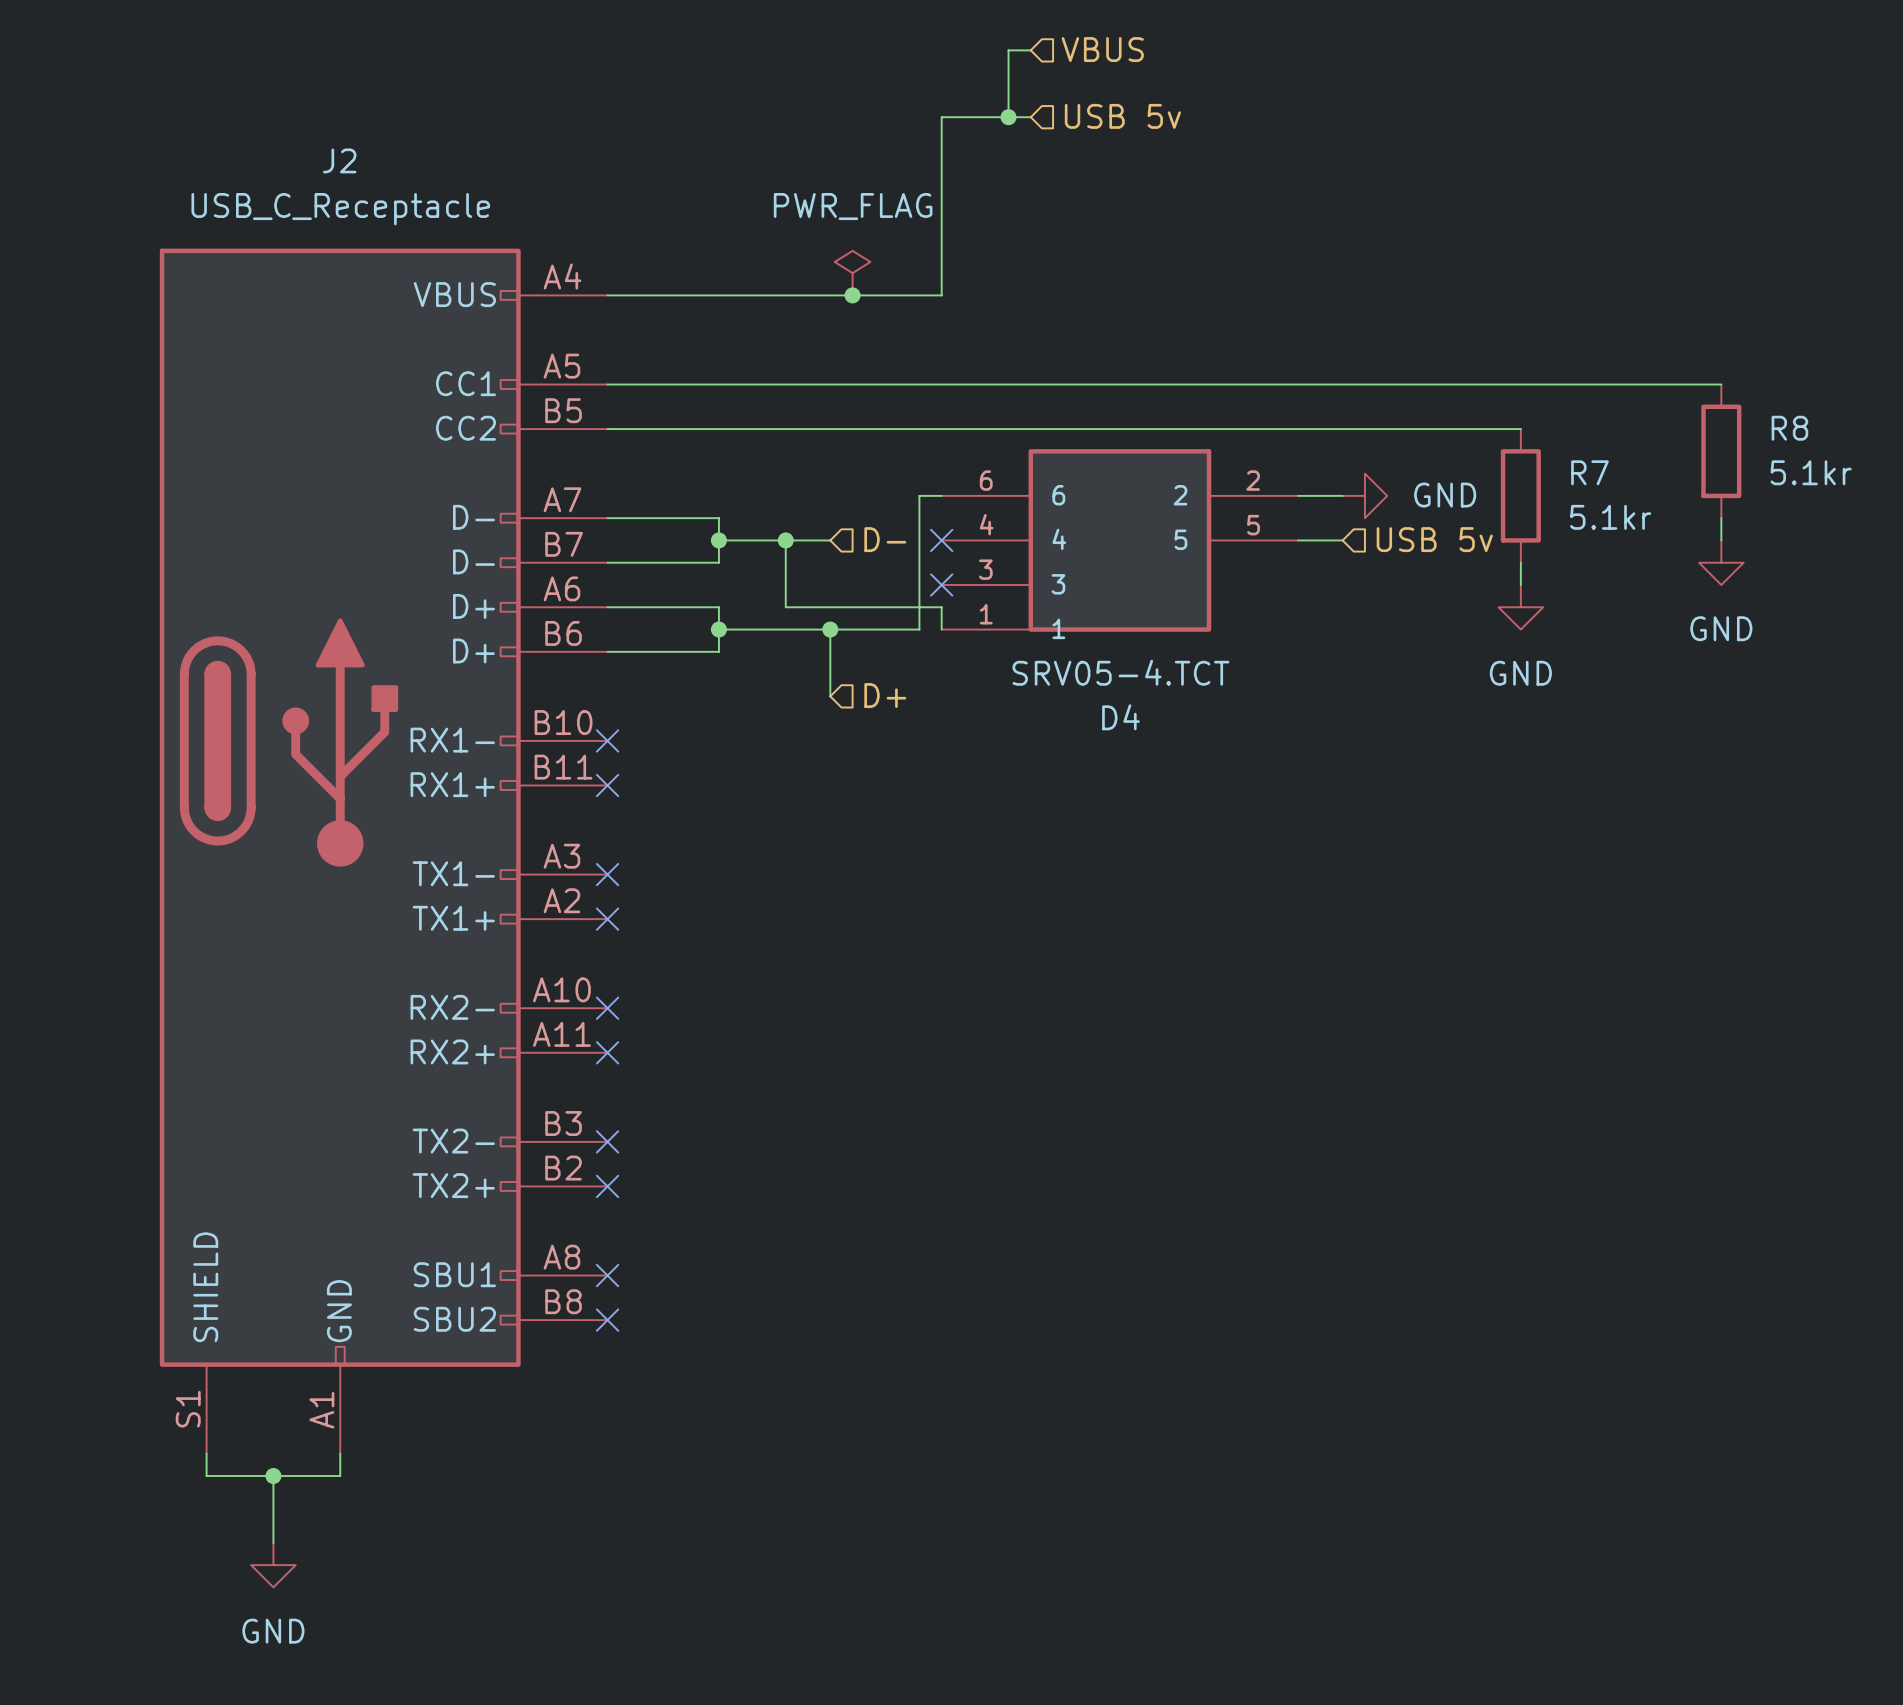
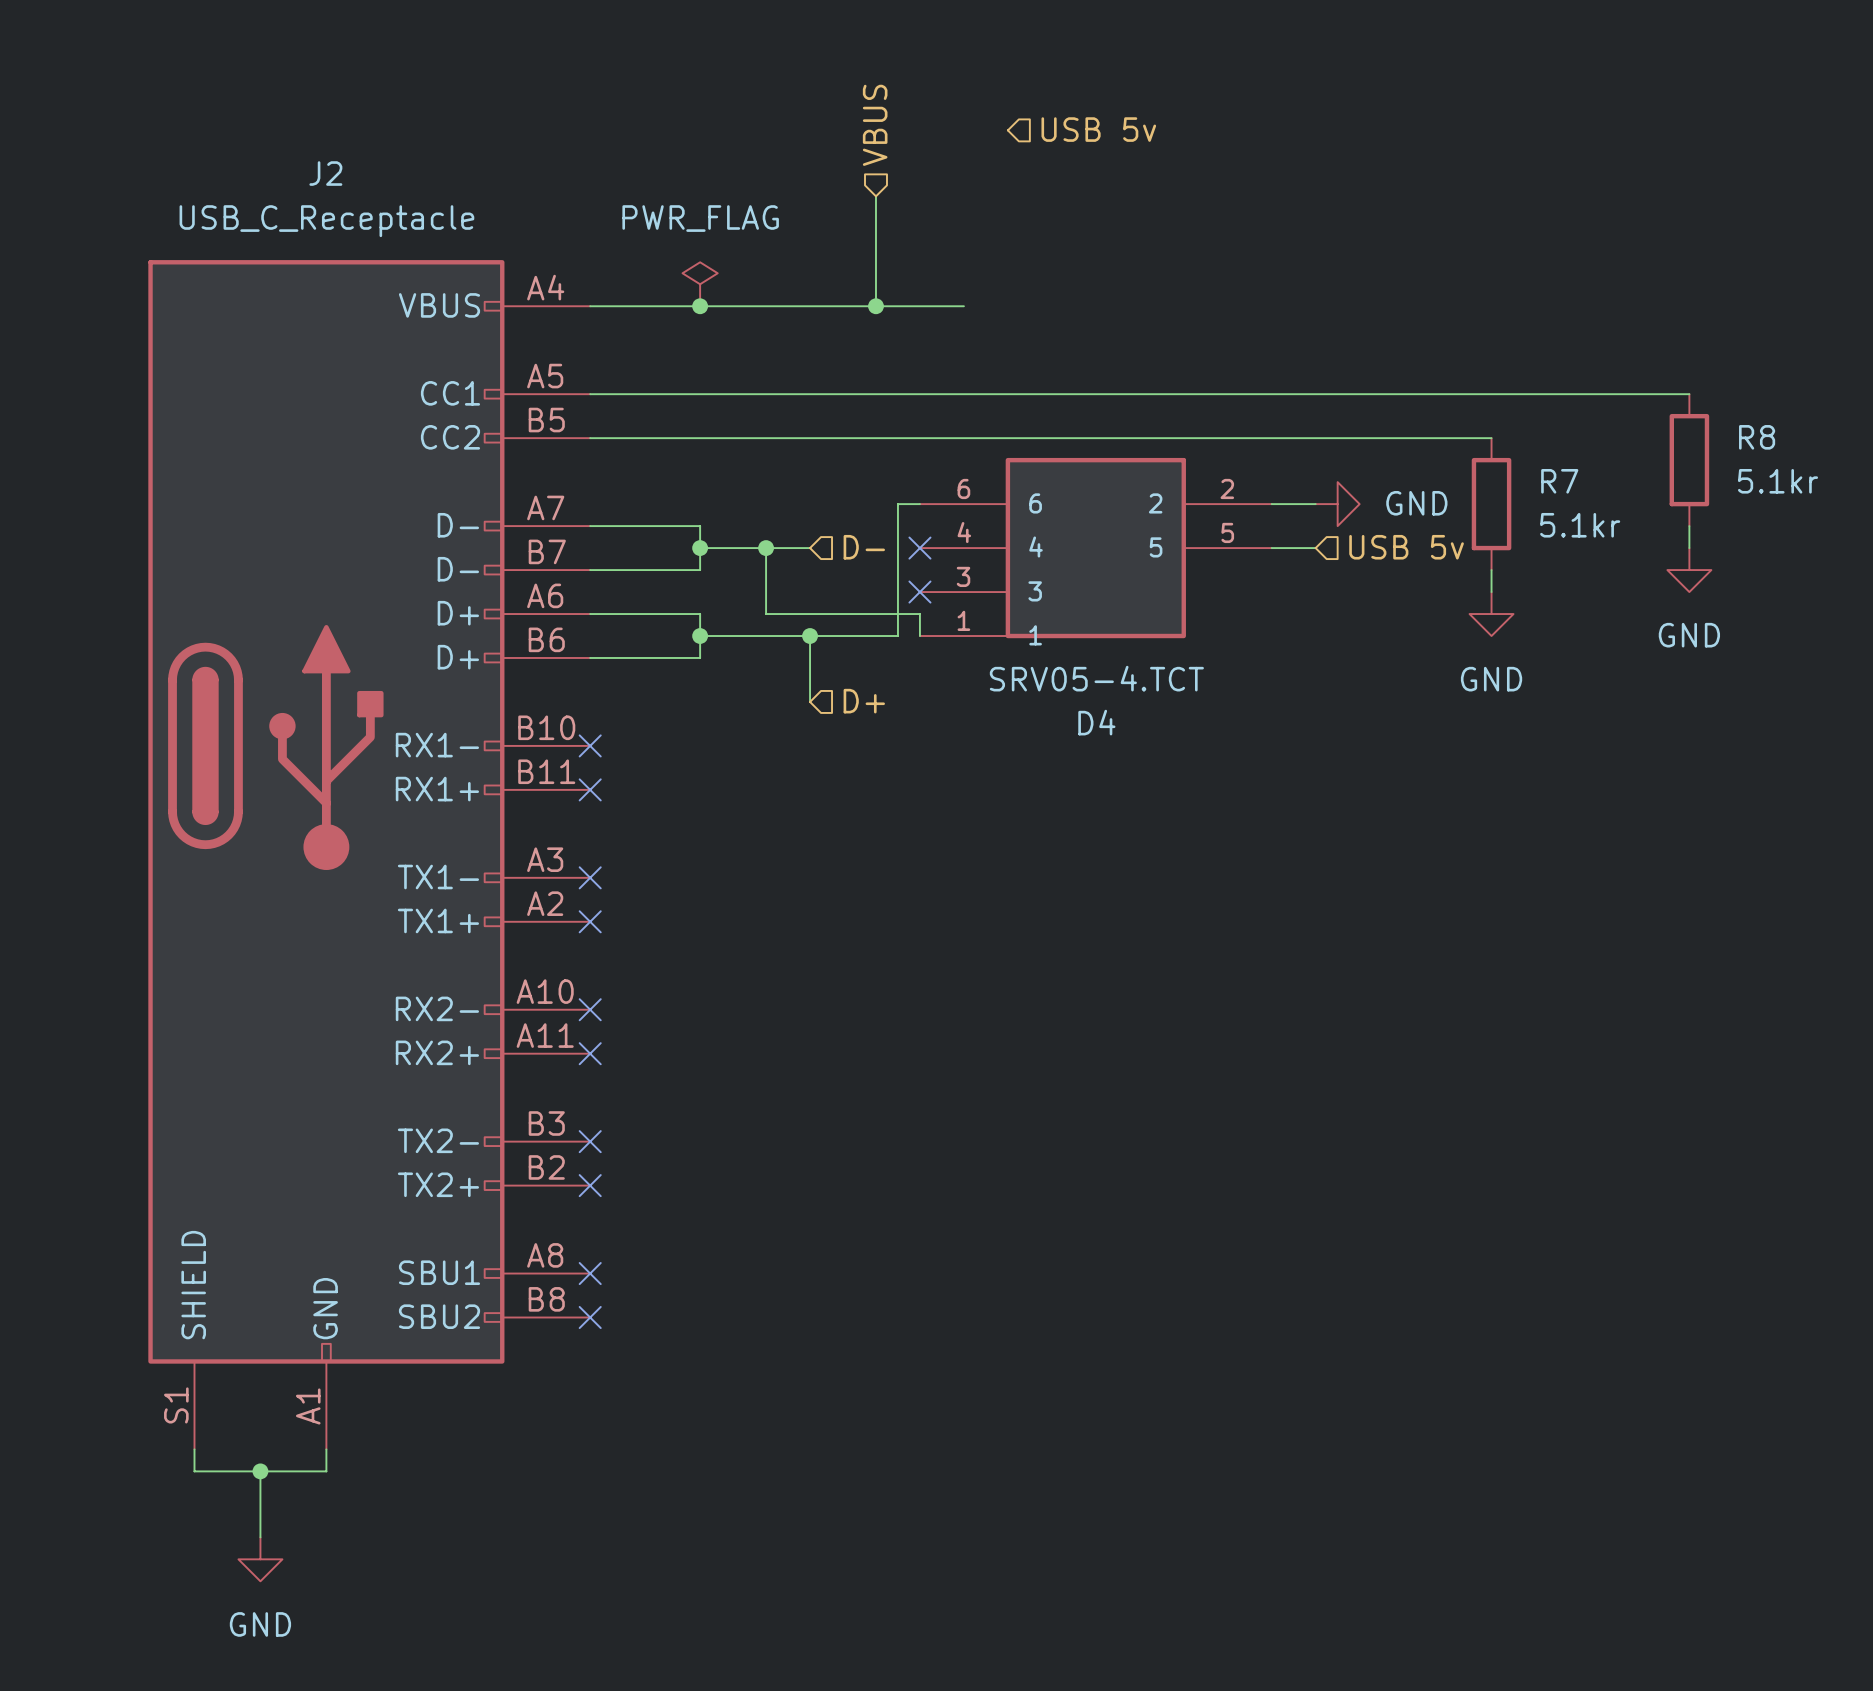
hierarchical label rotation: 0° (1102, 49) -> 90° counterclockwise (875, 125)
hierarchical label position: VBUS (1102, 49) -> VBUS (875, 125)
wire: (1030, 50) (1008, 50) (1008, 117) -> none
junction: (1008, 117) -> none
wire: (1030, 117) (941, 117) (941, 295) -> (963, 306) (919, 306)
wire: none -> (875, 196) (875, 306)
power symbol position: PWR_FLAG (852, 273) -> PWR_FLAG (700, 284)
junction: none -> (700, 306)
junction position: (852, 295) -> (875, 306)

